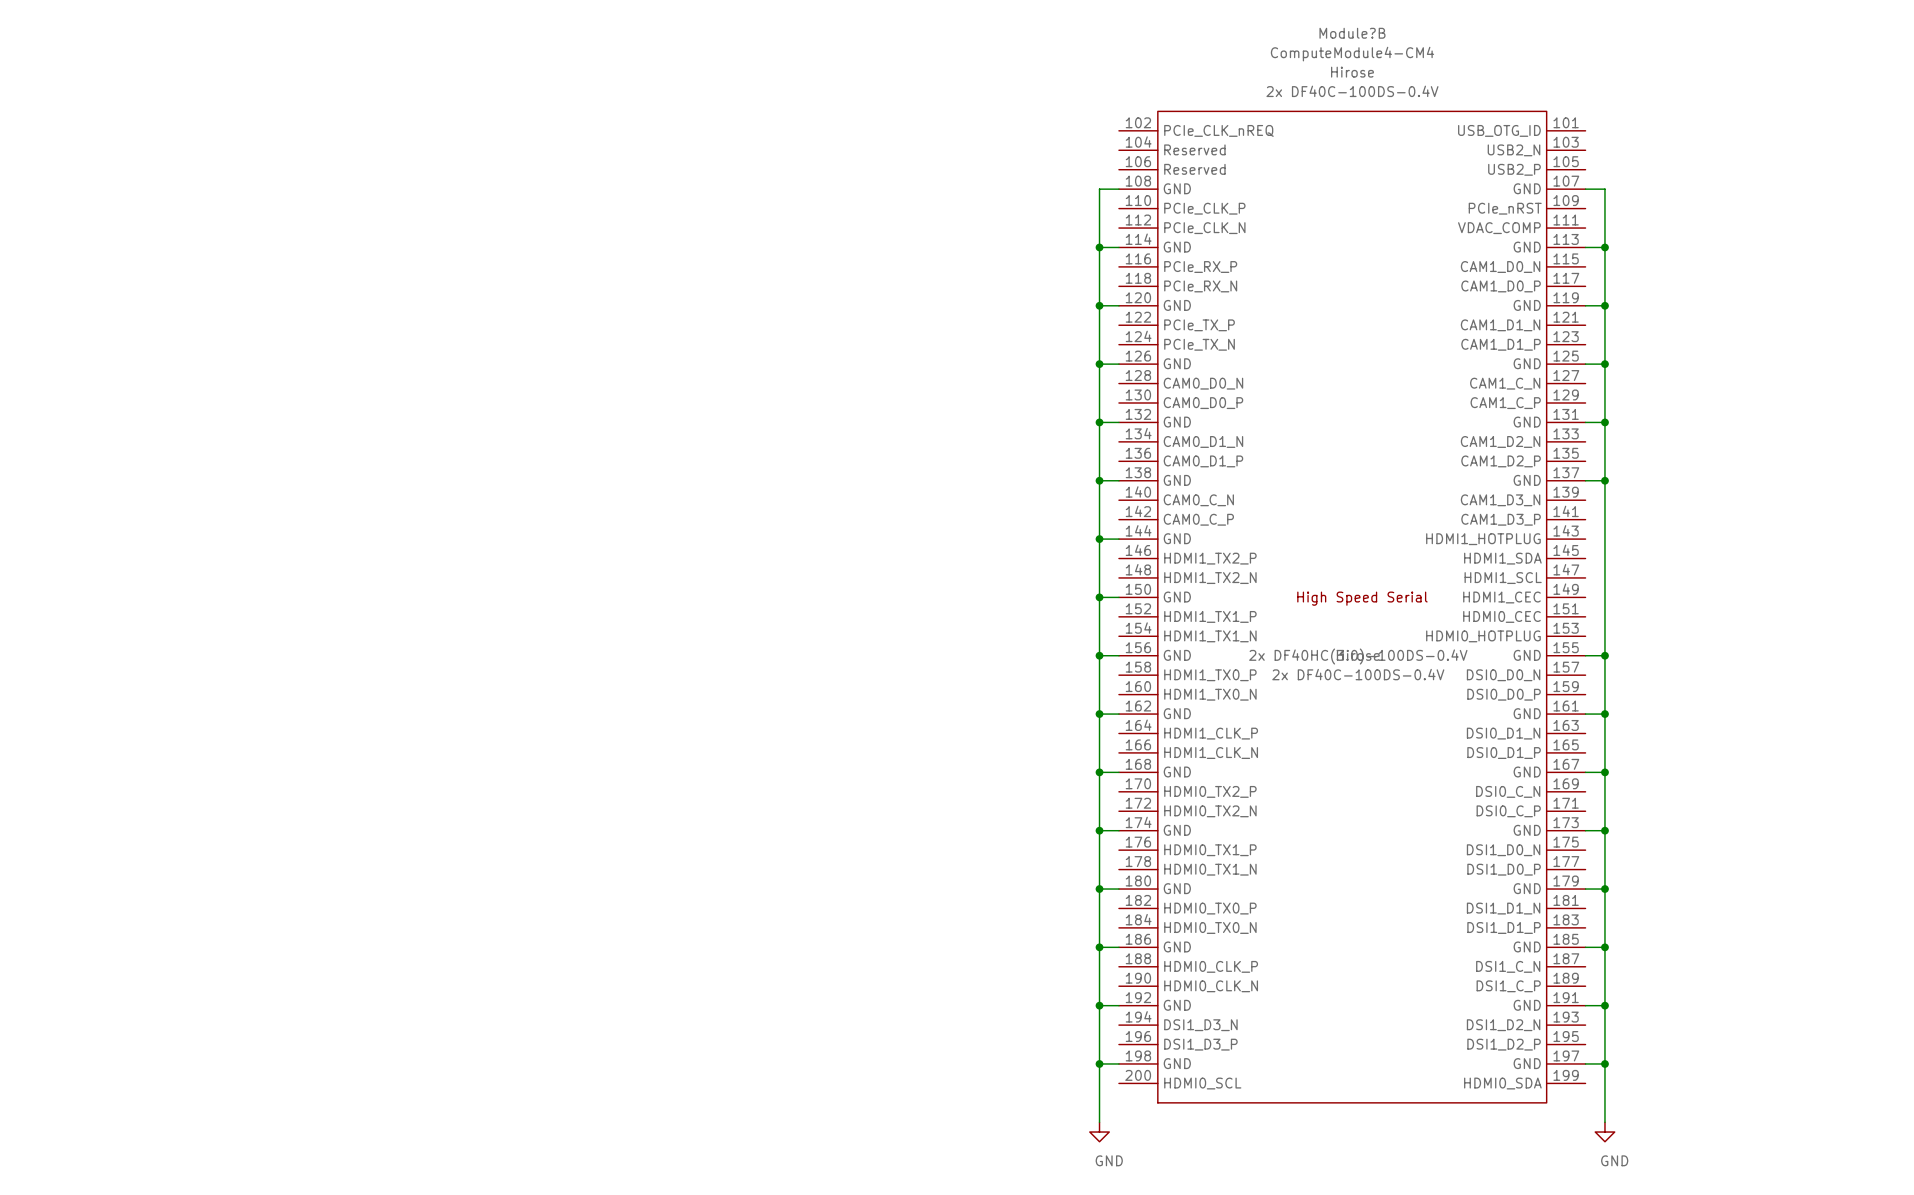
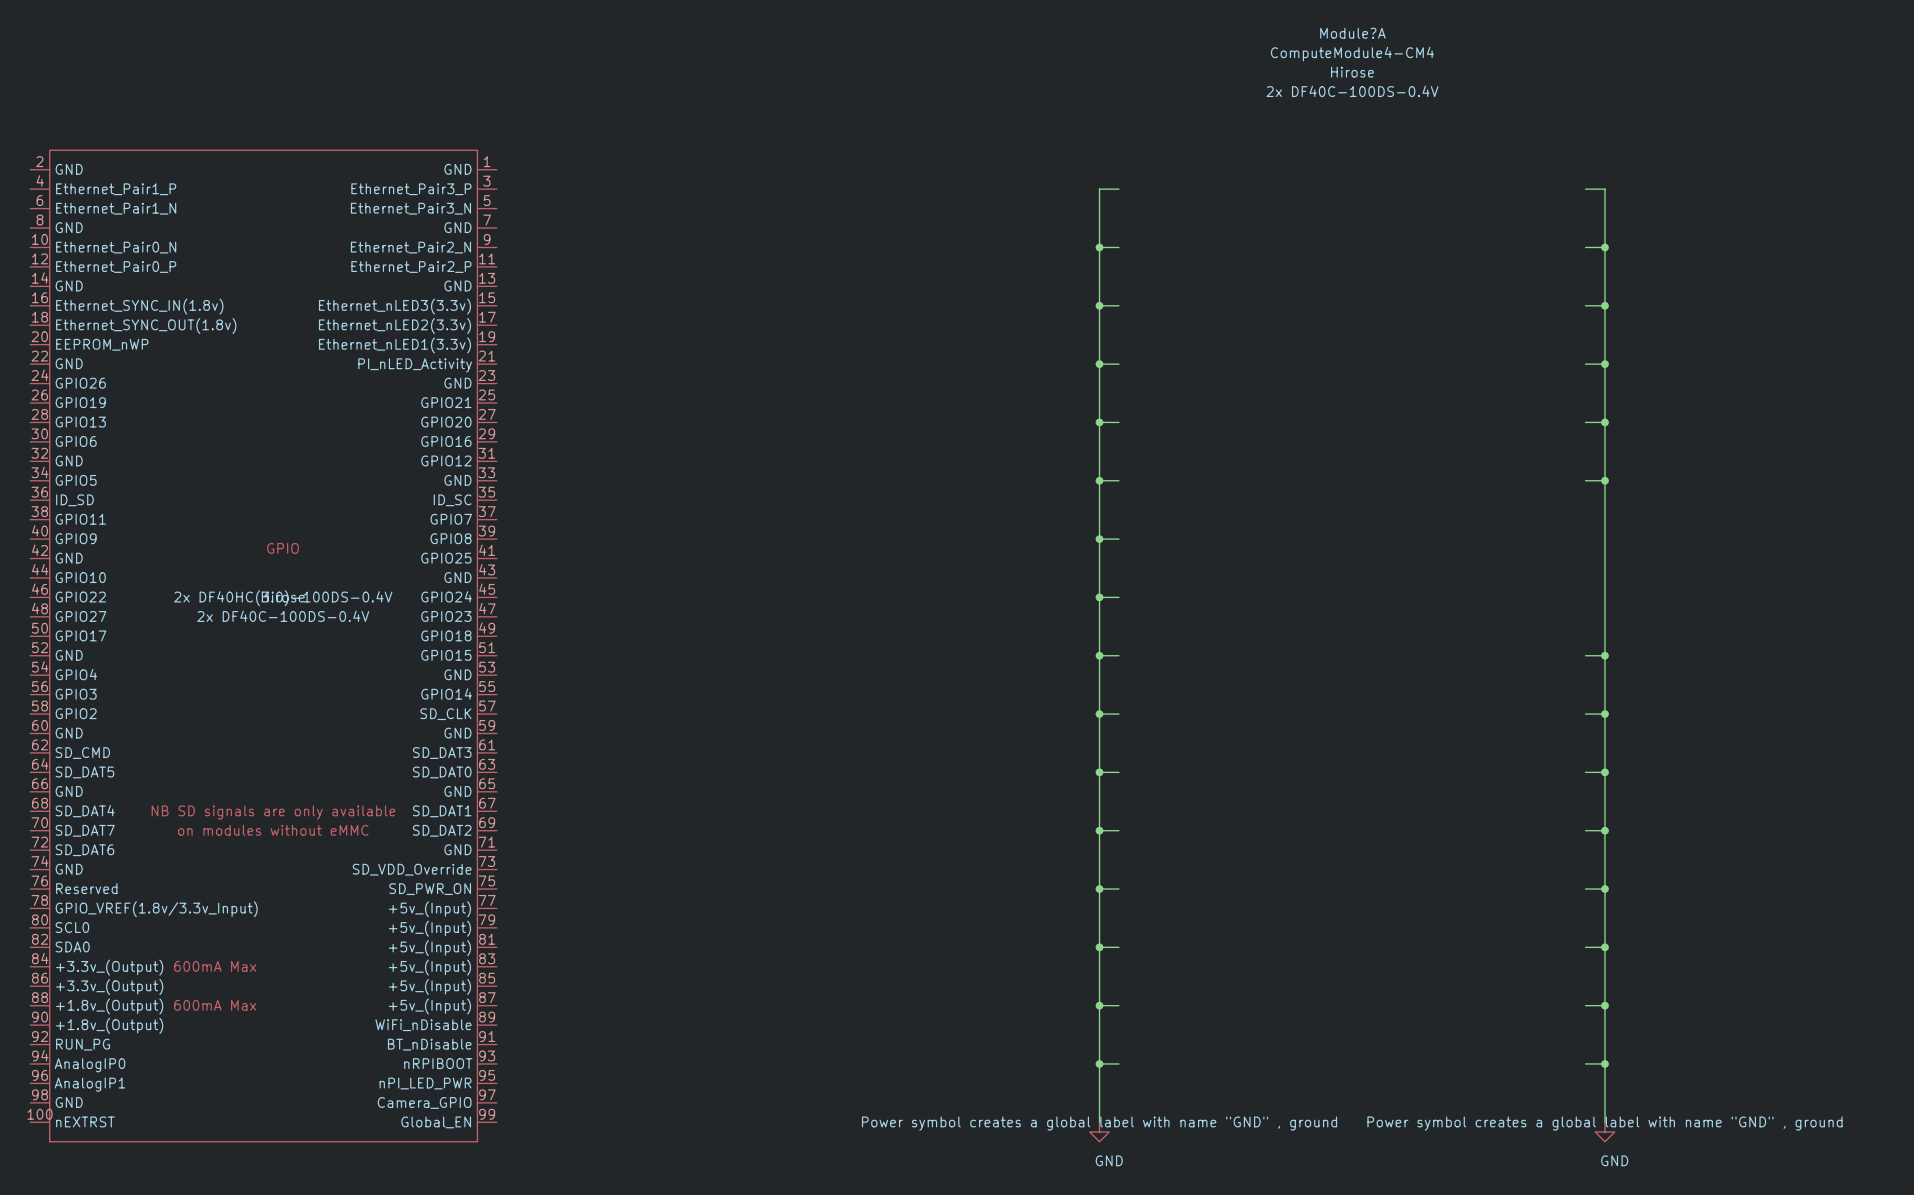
Module?B: ComputeModule4-CM4 (1352, 607) -> none
Module?A: none -> ComputeModule4-CM4 (263, 646)
power symbol text: none -> Power symbol creates a global label with name "GND" , ground (1099, 1123)
power symbol text: none -> Power symbol creates a global label with name "GND" , ground (1604, 1123)

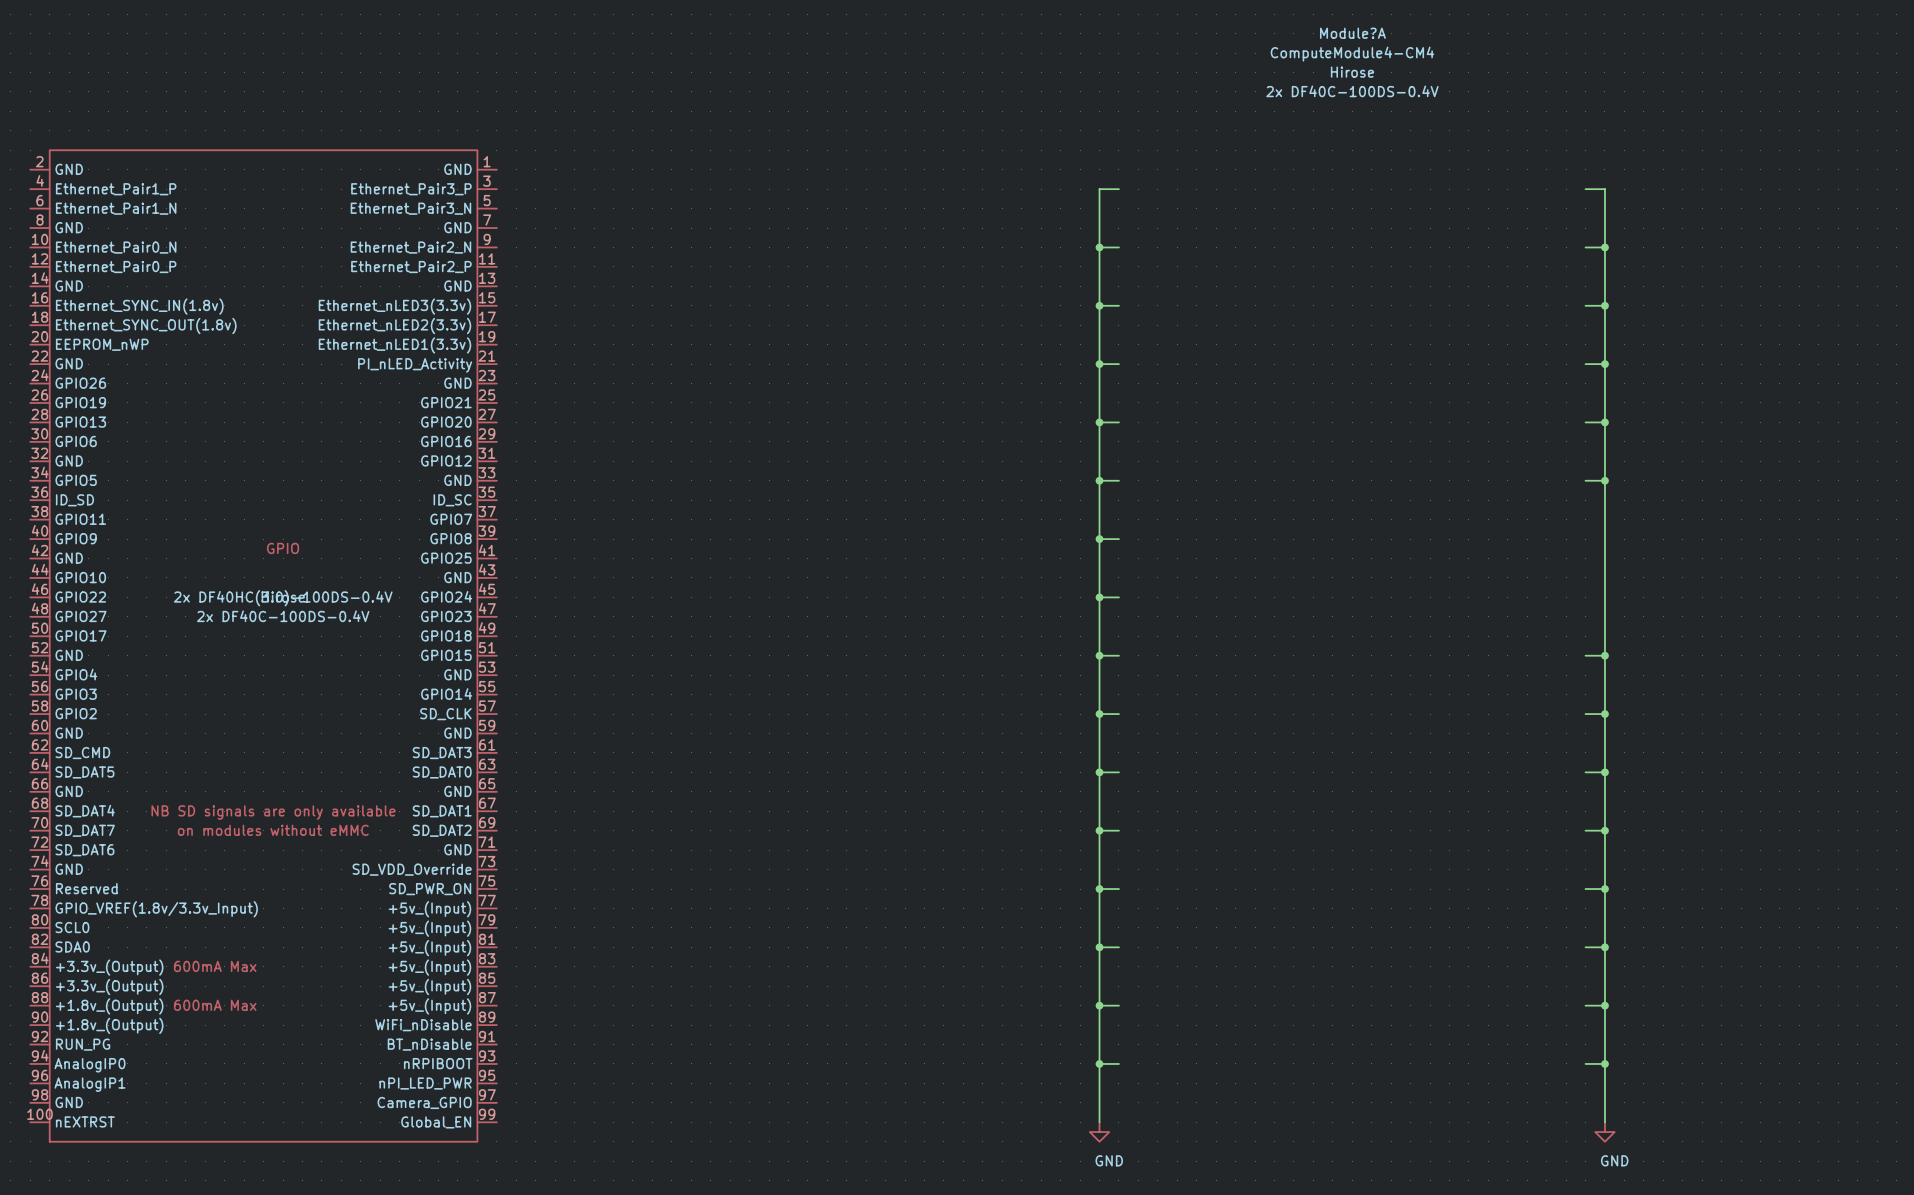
power symbol text: Power symbol creates a global label with name "GND" , ground (1099, 1123) -> none
power symbol text: Power symbol creates a global label with name "GND" , ground (1604, 1123) -> none

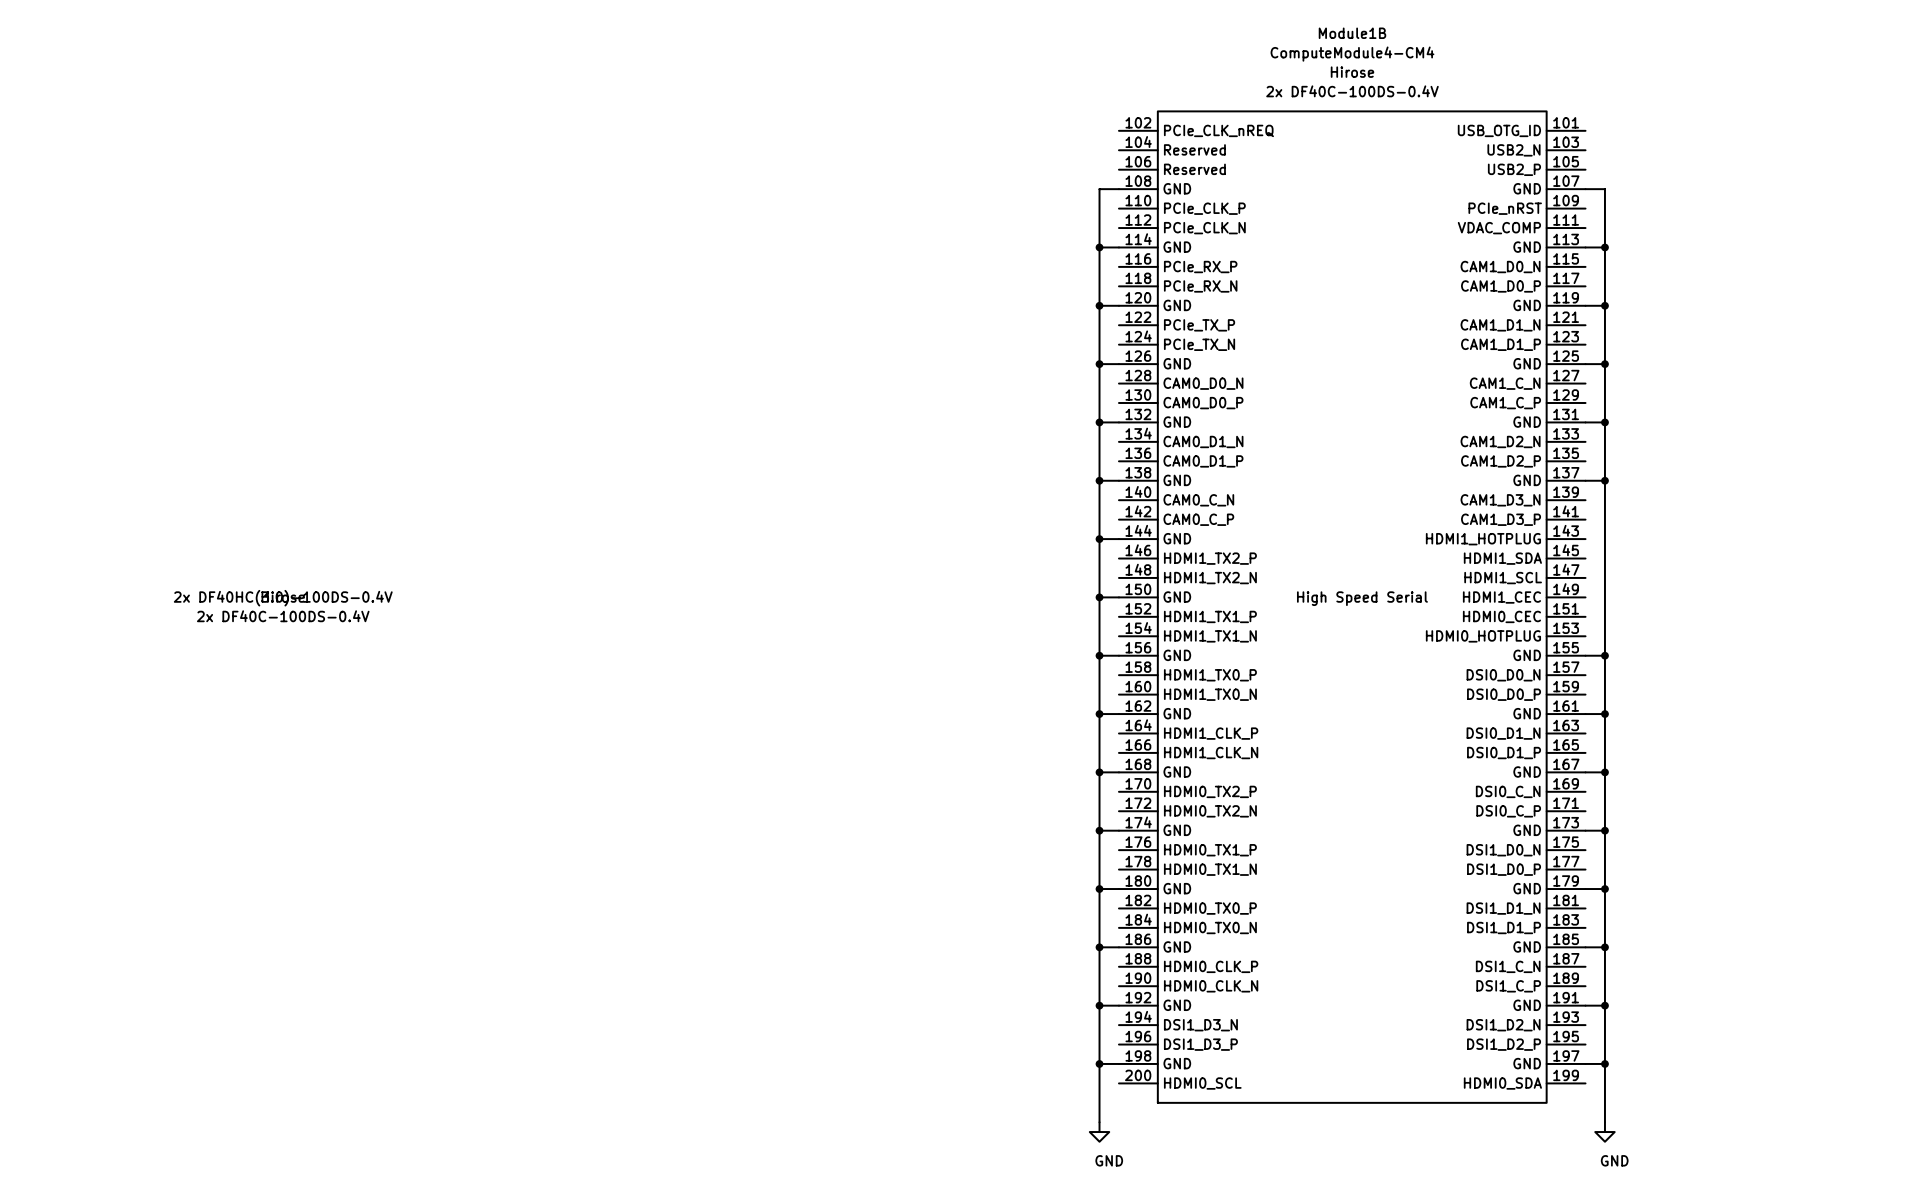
Module1B: none -> ComputeModule4-CM4 (1352, 607)
Module?A: ComputeModule4-CM4 (263, 646) -> none

